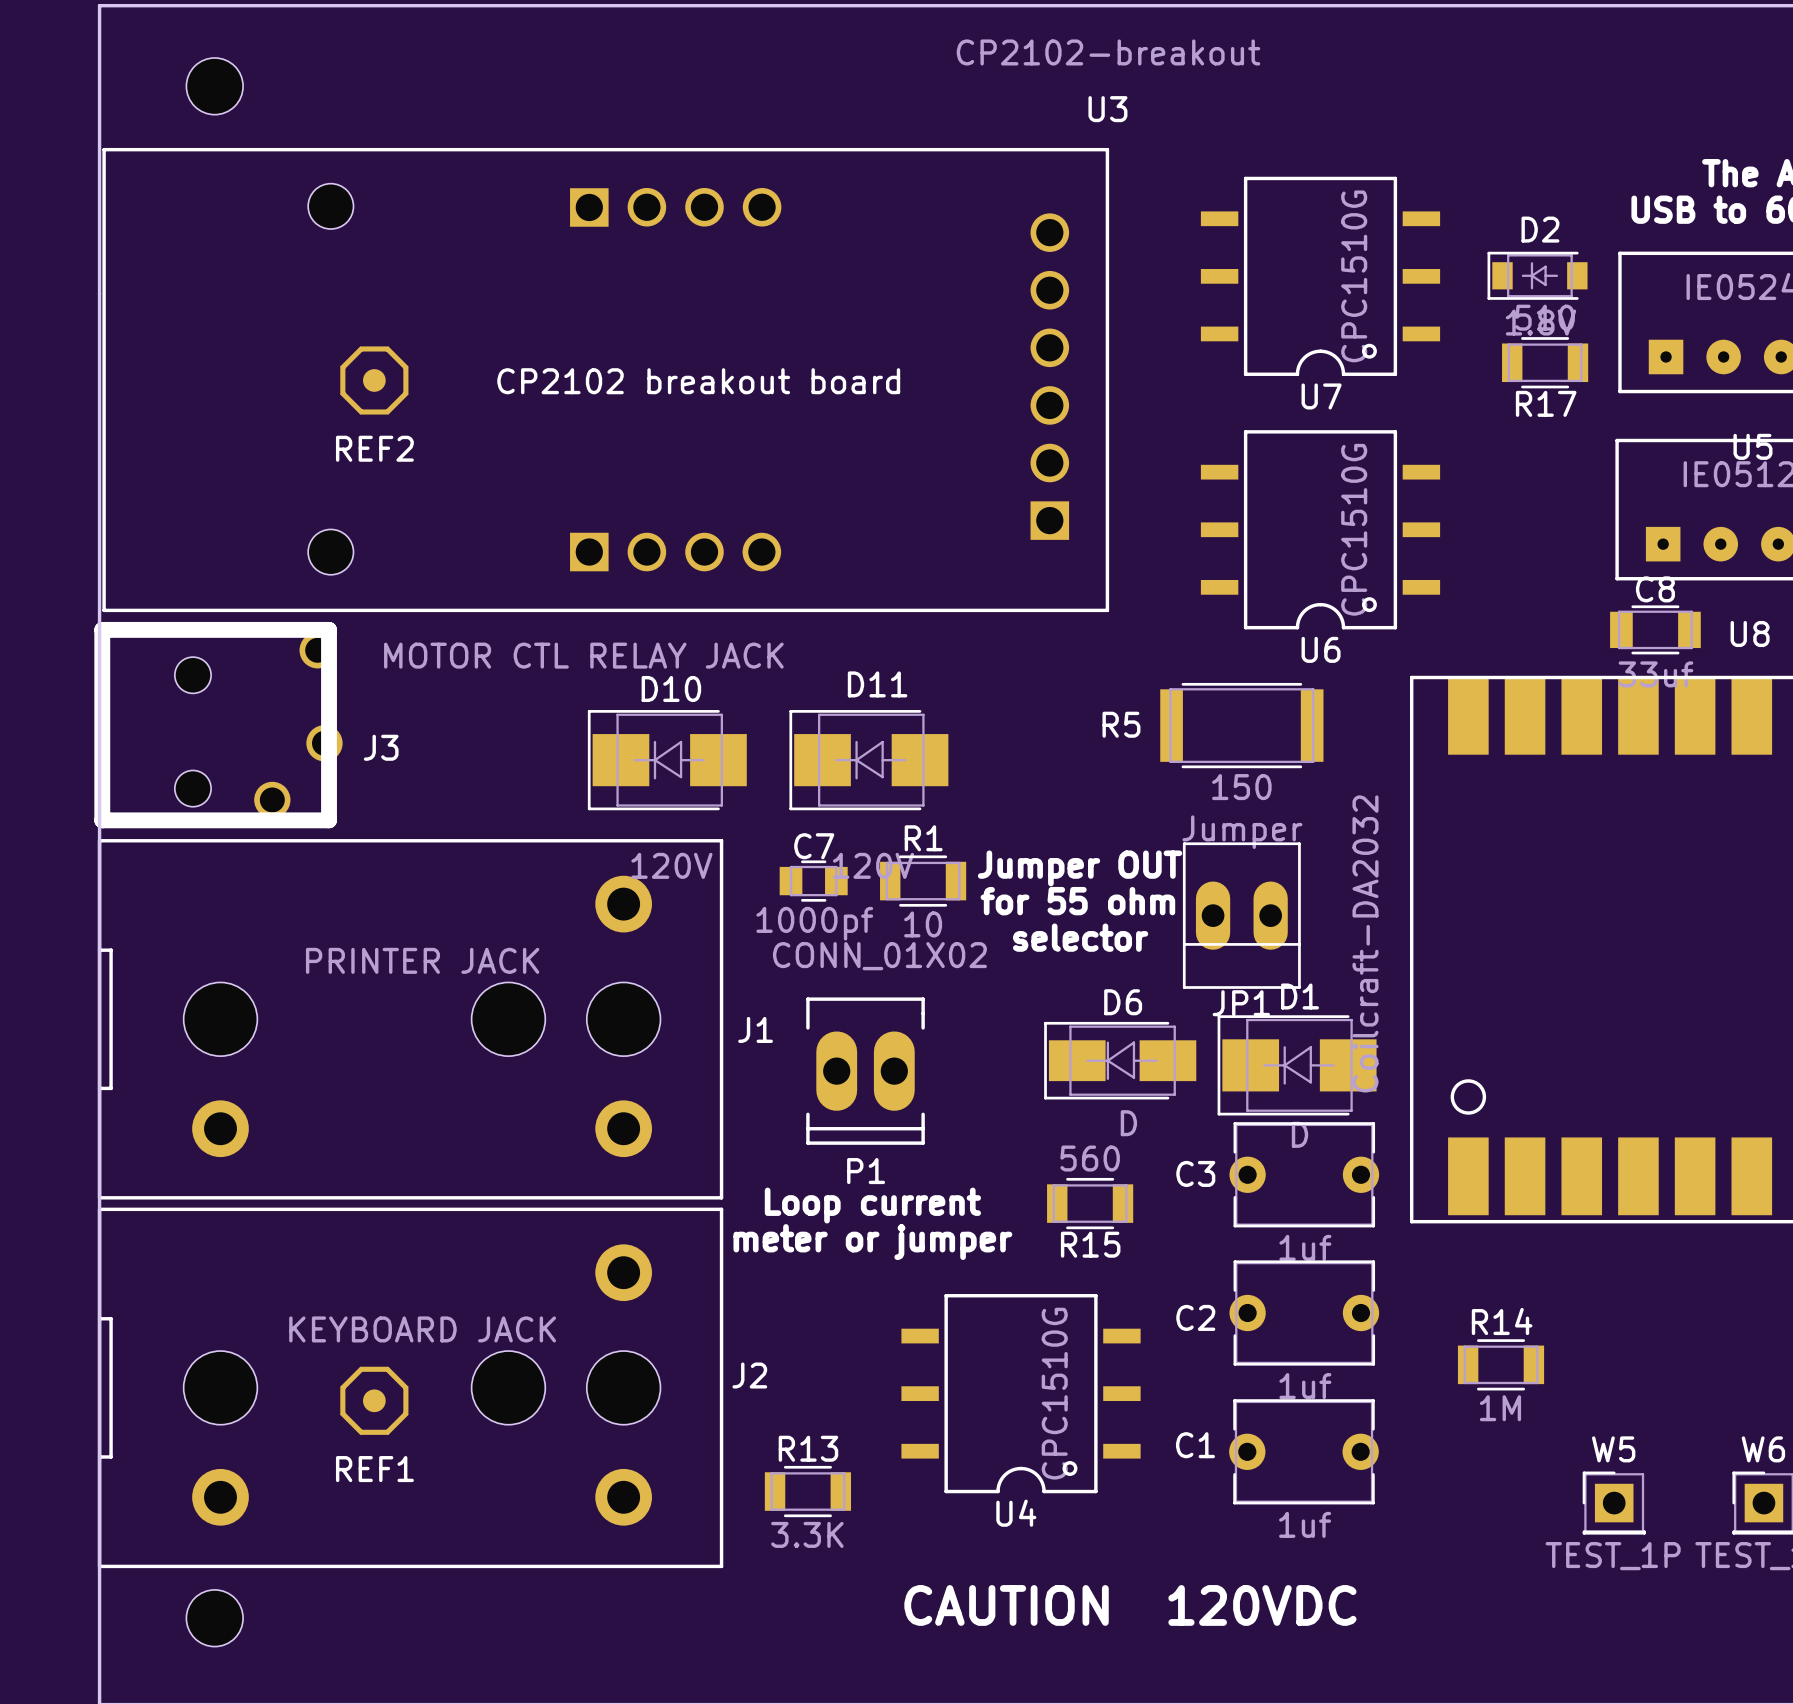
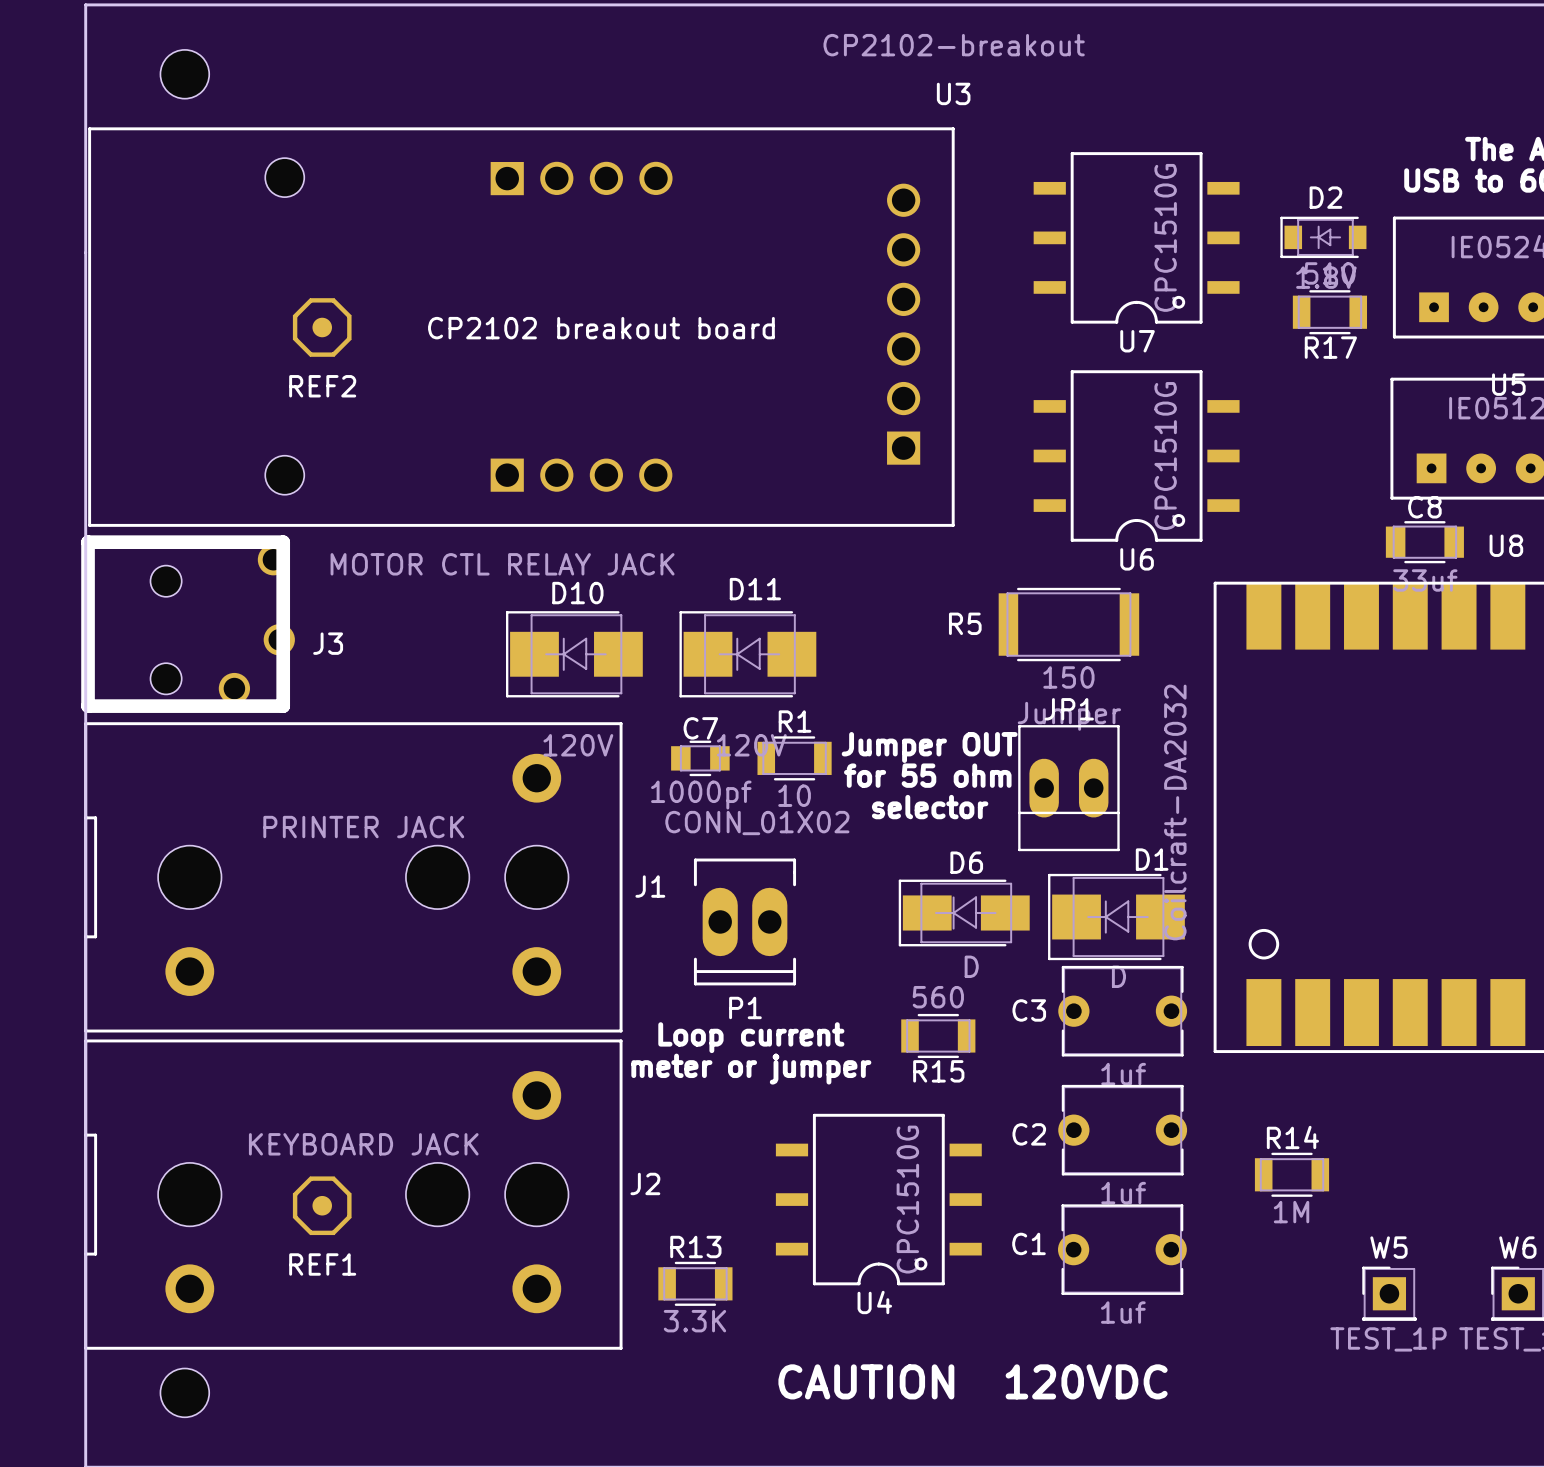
D1 name position: D1 (1299, 996) -> D1 (1152, 859)
JP1 name position: JP1 (1241, 1003) -> JP1 (1069, 709)

